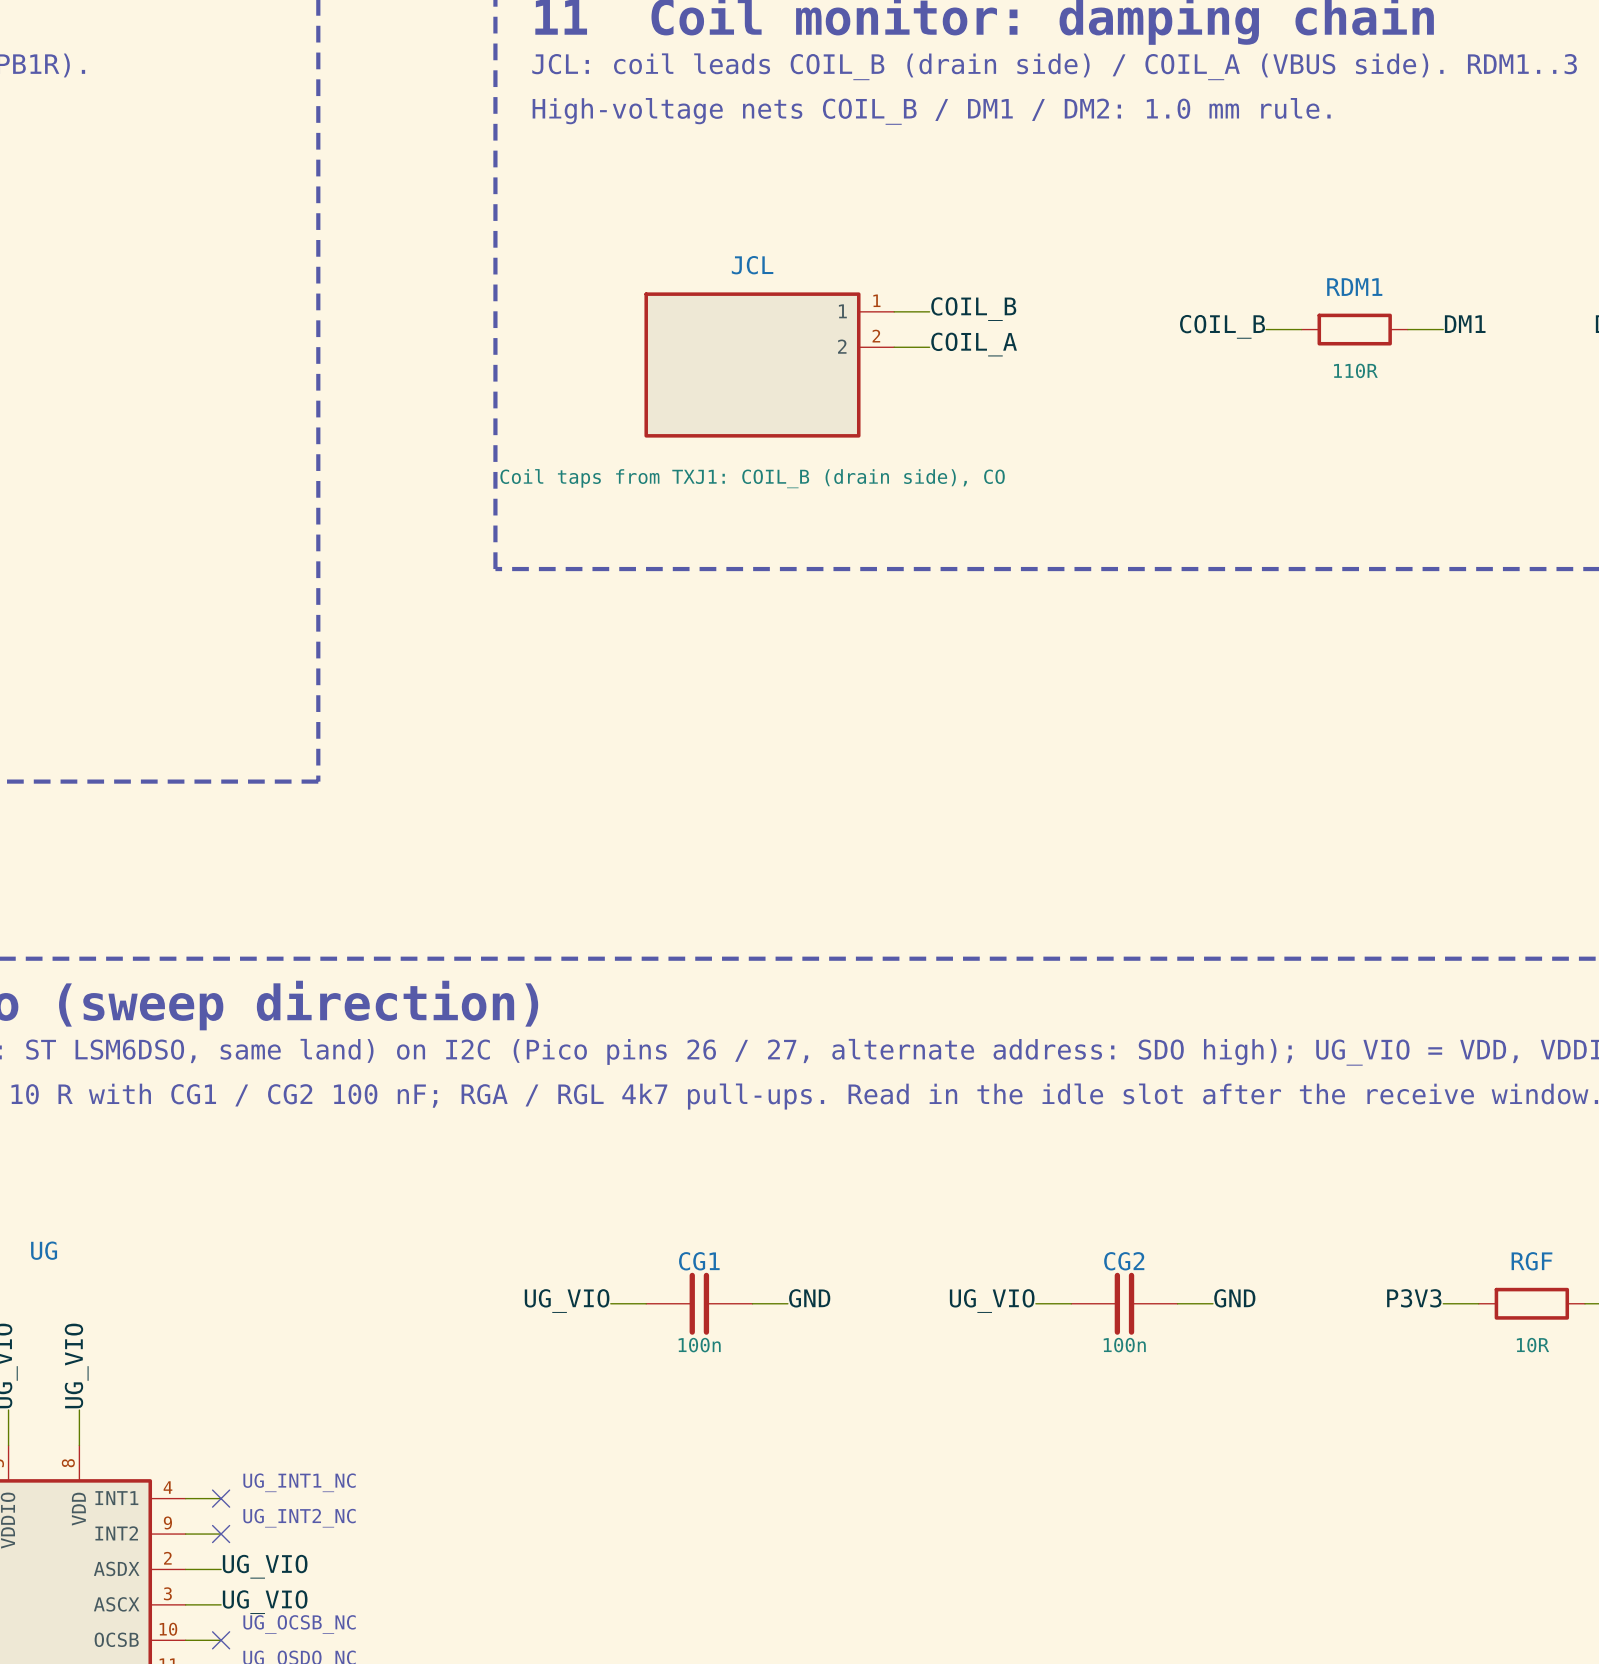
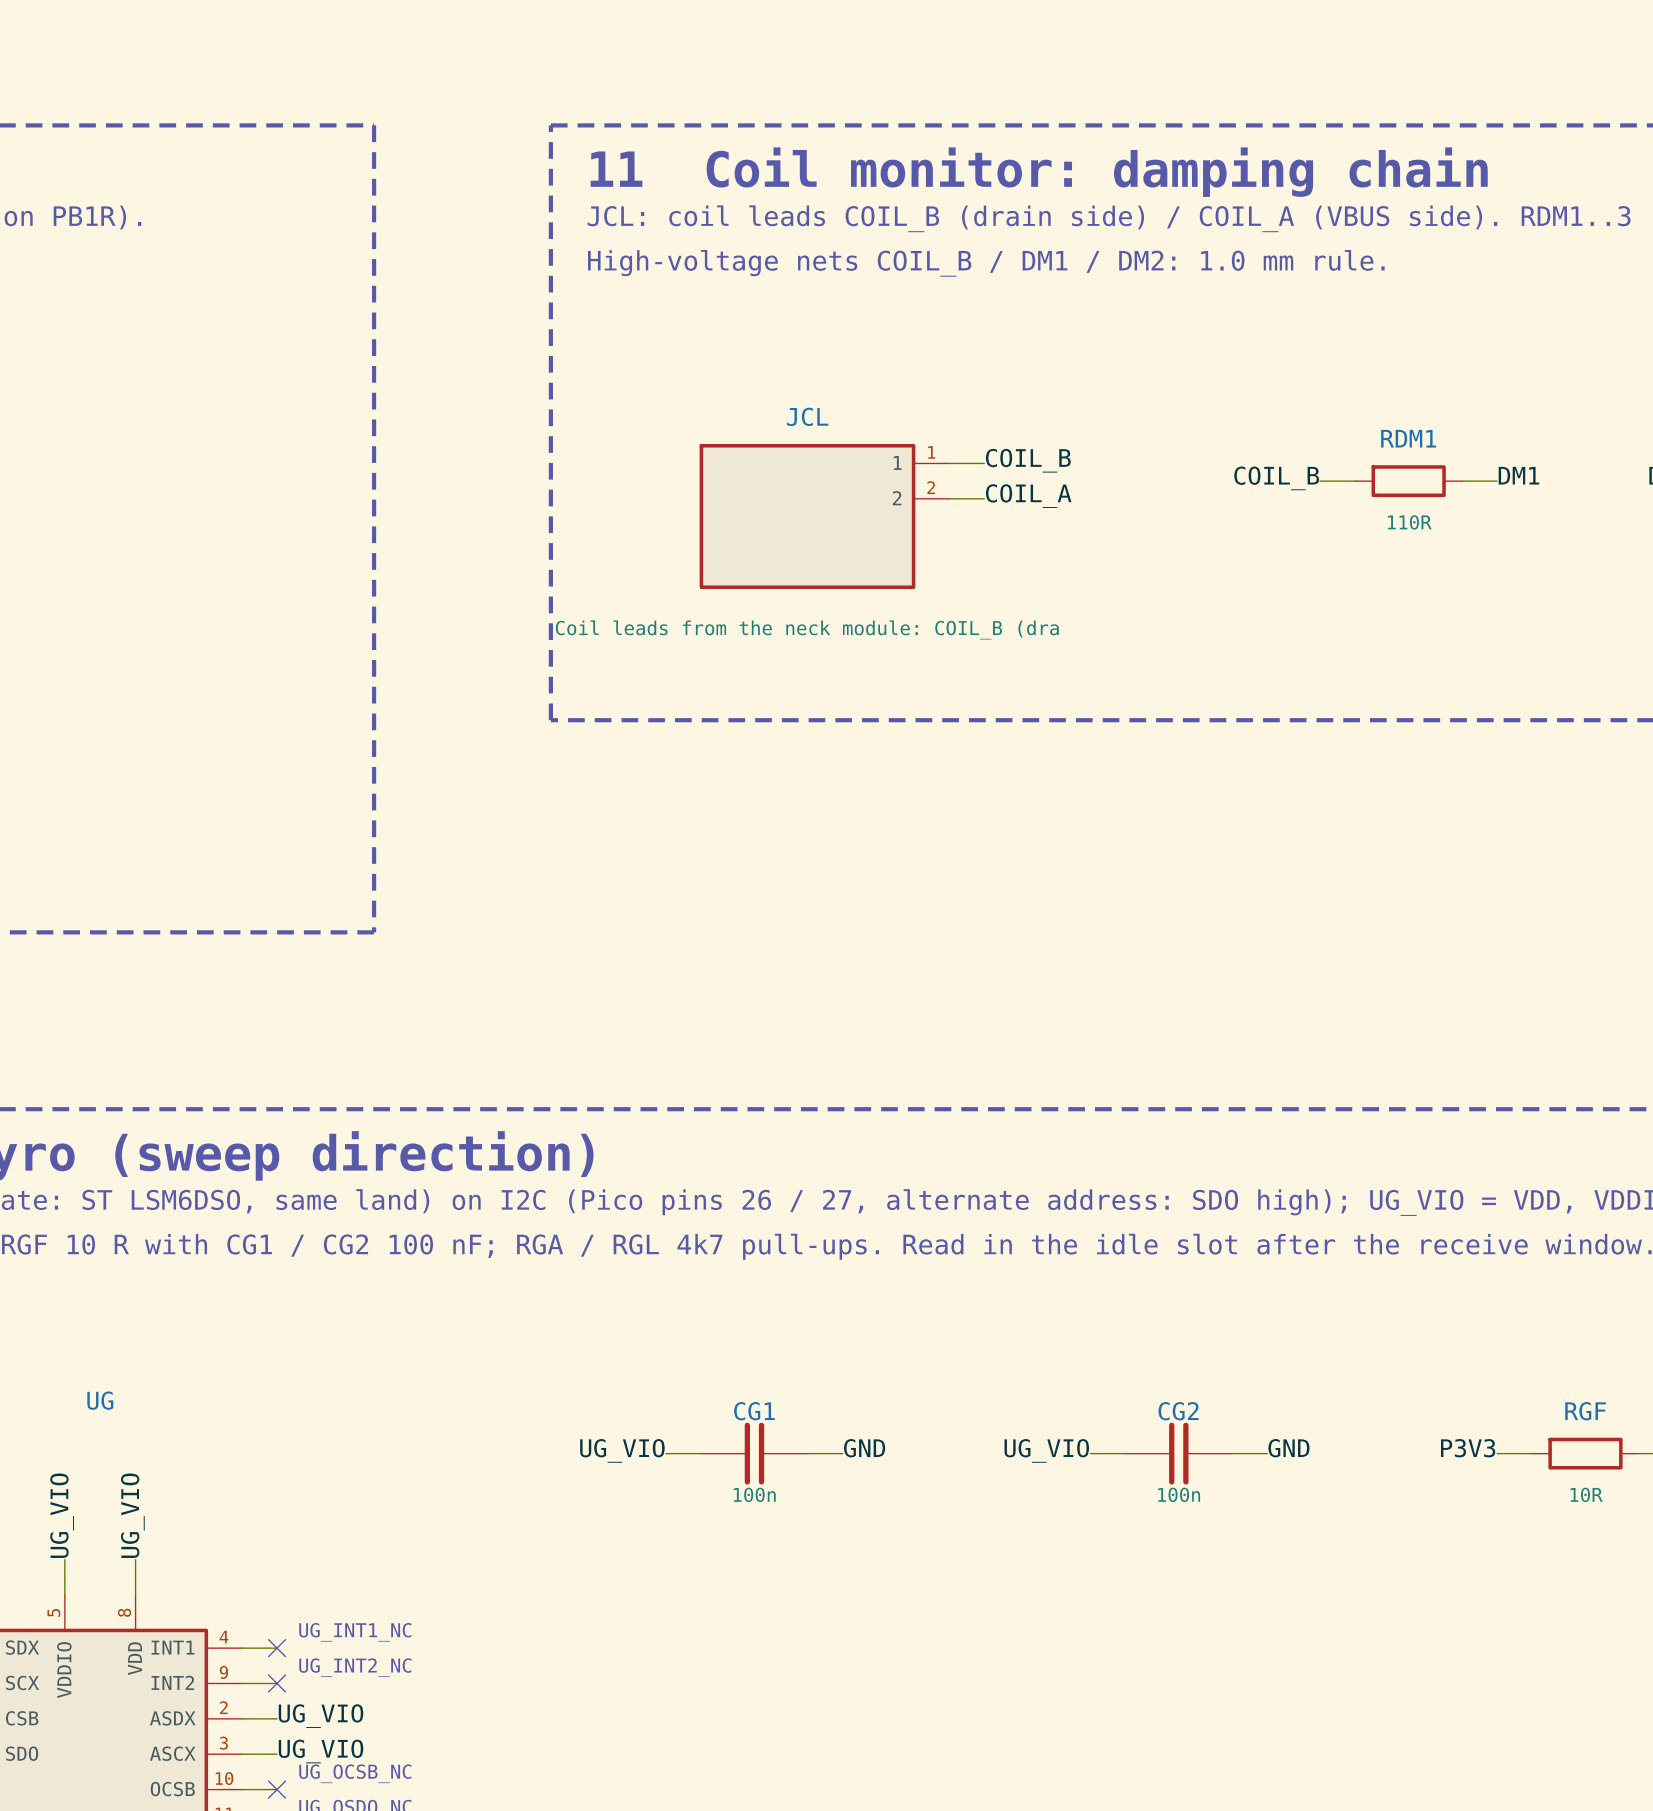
JCL value: Coil taps from TXJ1: COIL_B (drain side), CO (752, 478) -> Coil leads from the neck module: COIL_B (dra (807, 629)

